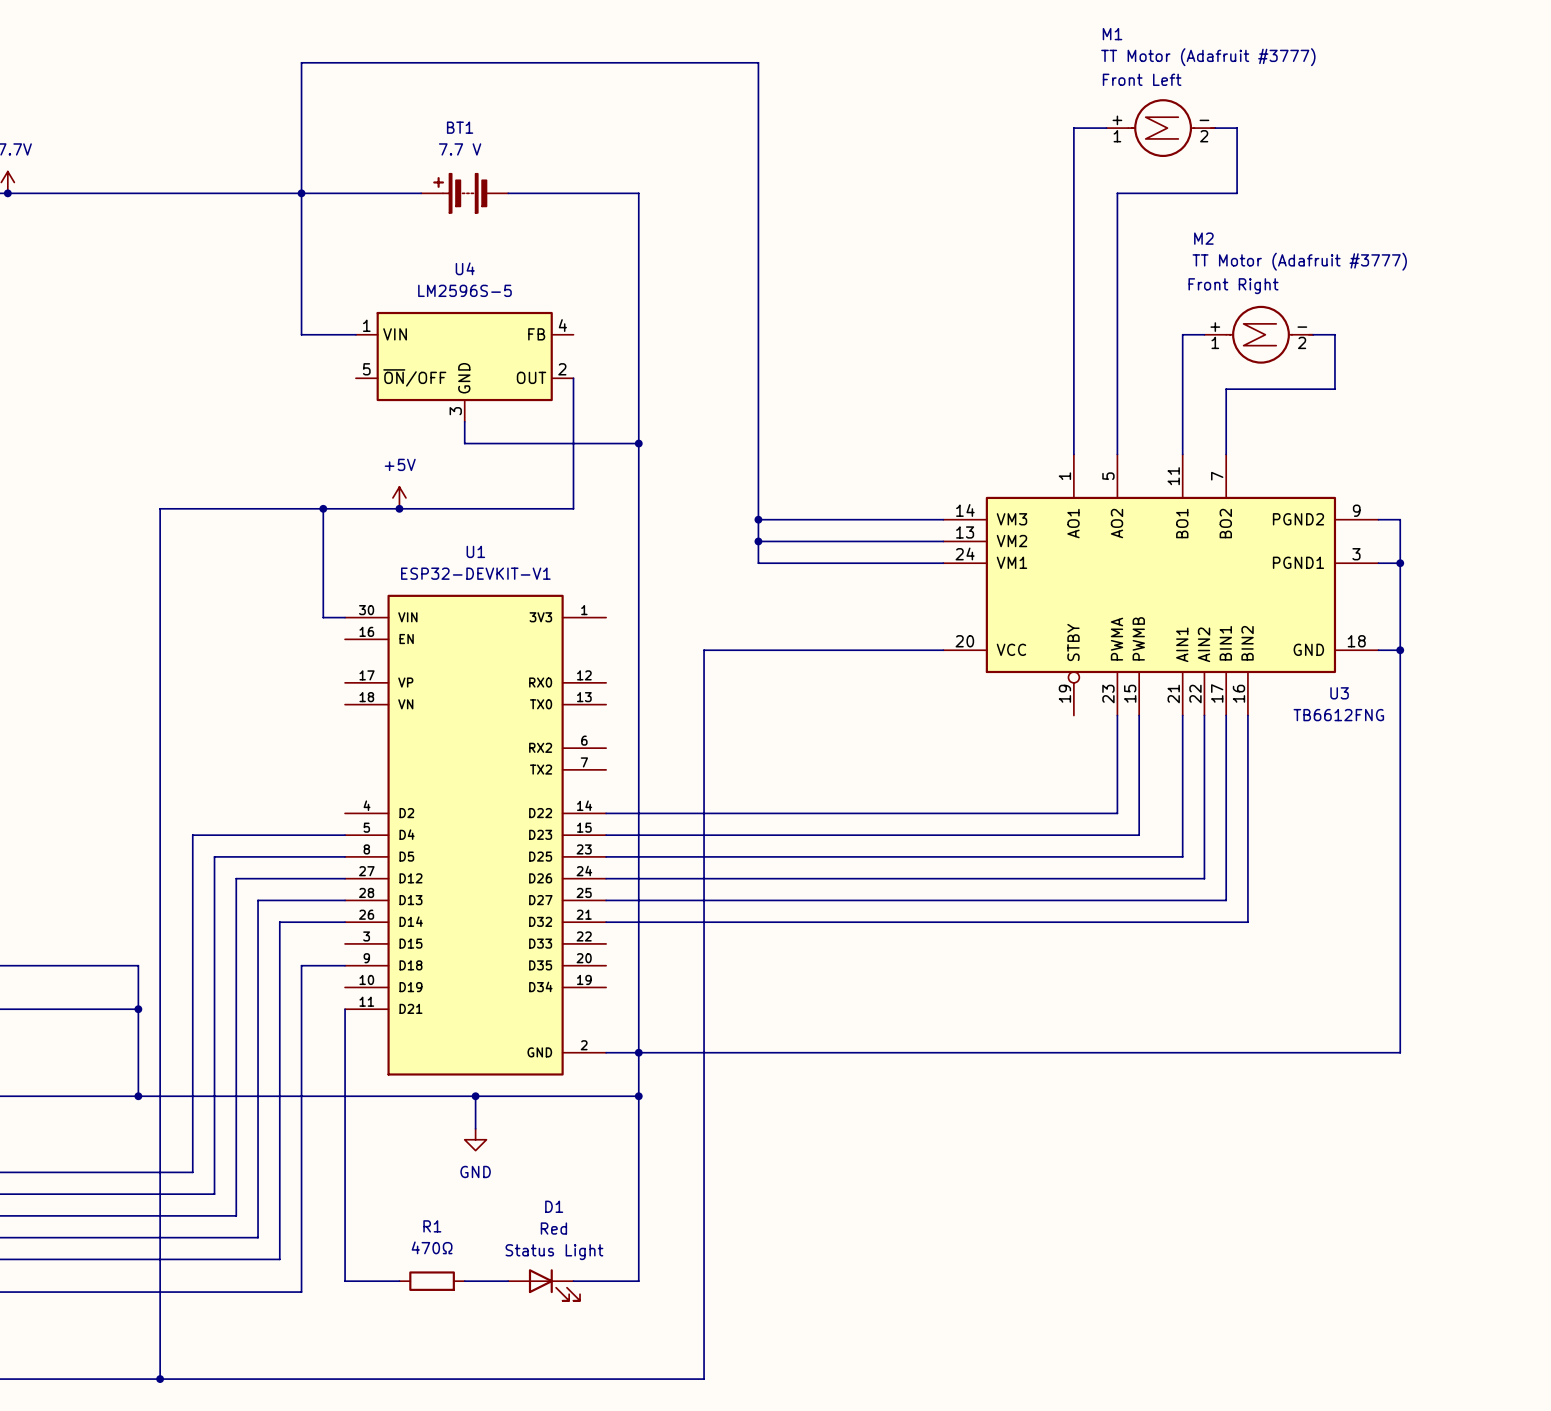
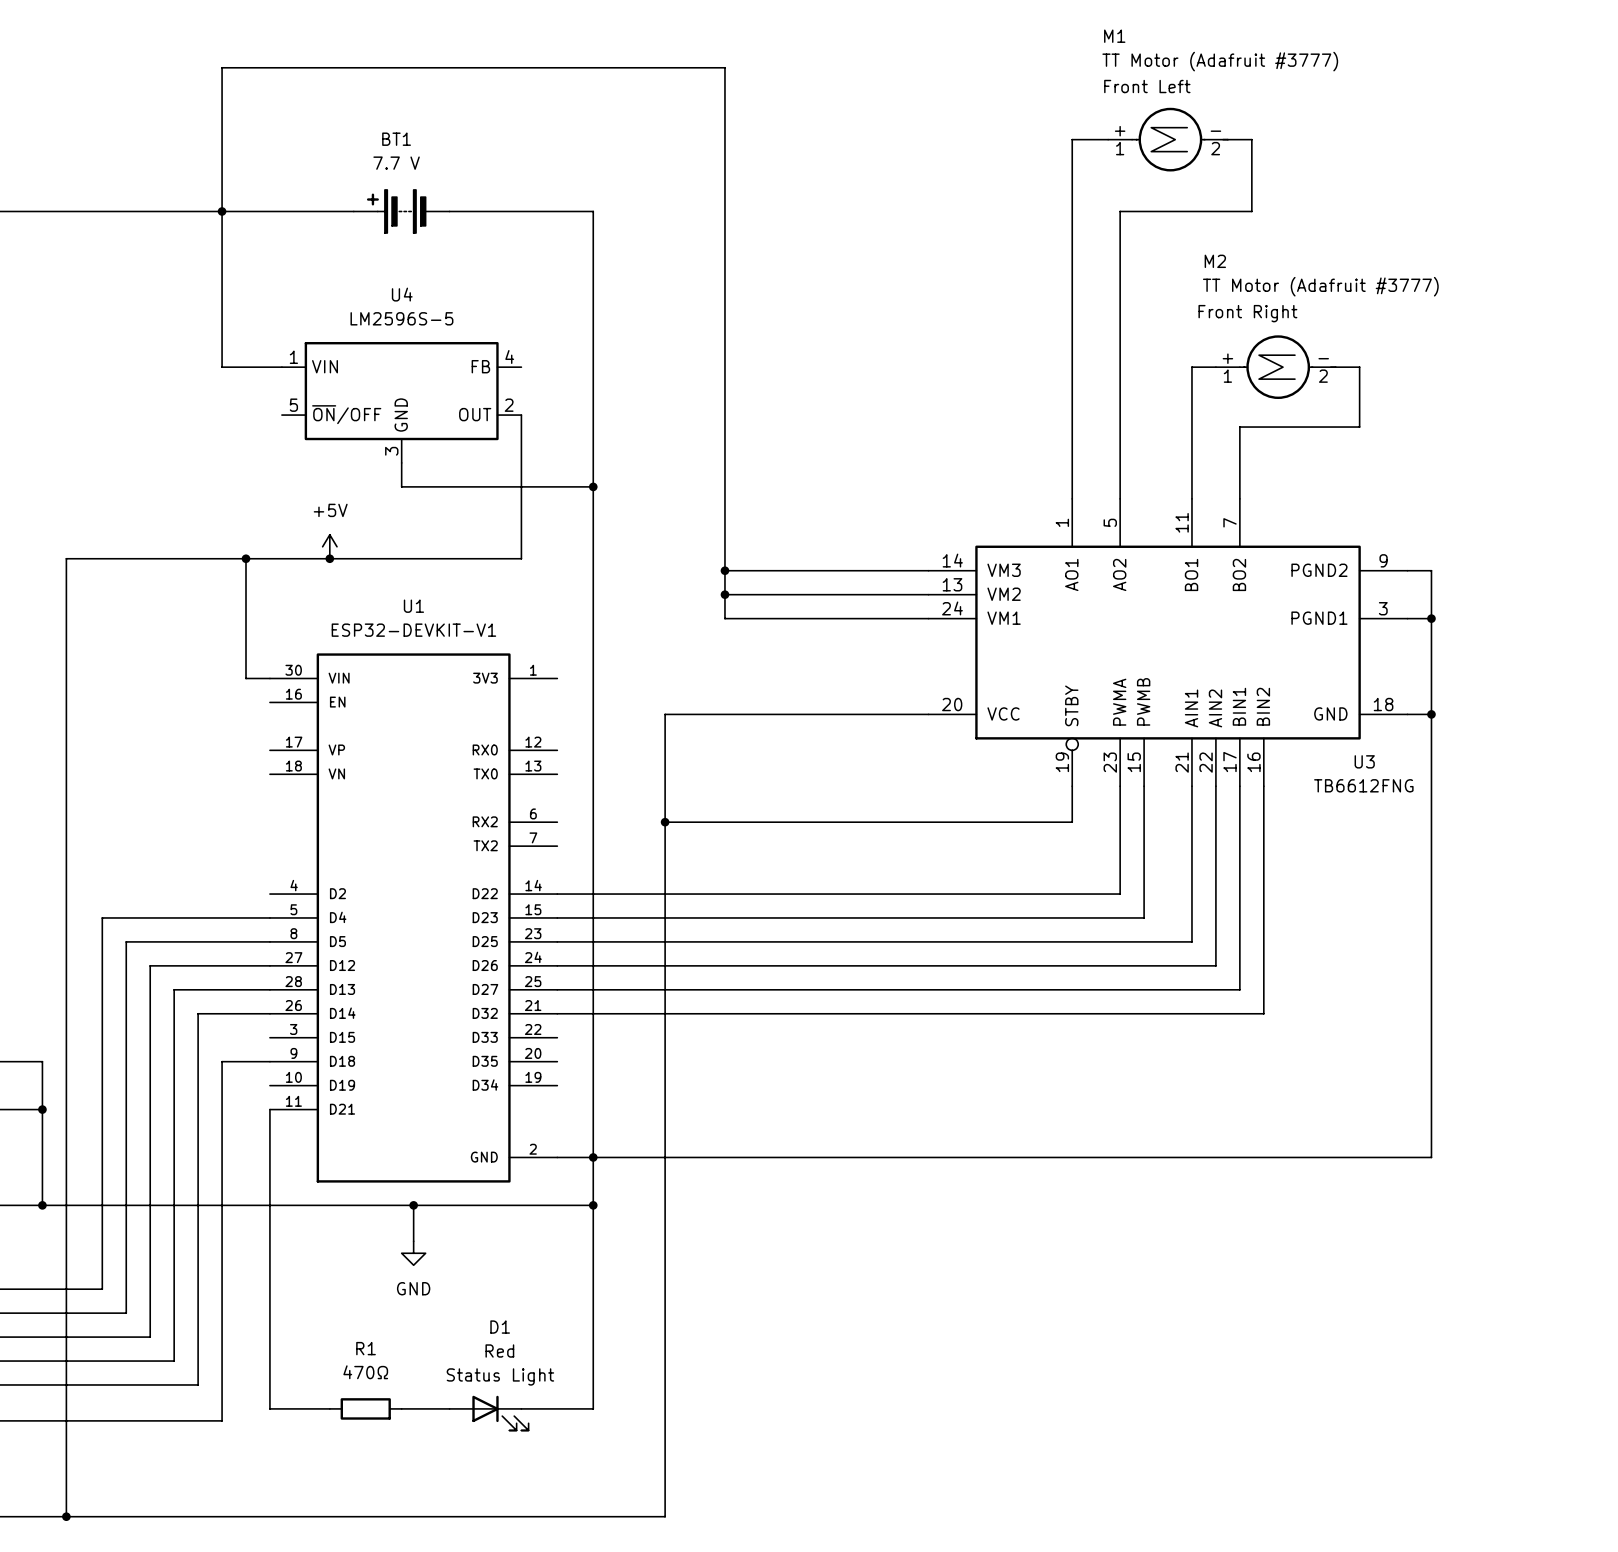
wire: none -> (1072, 786) (1072, 822) (665, 822)
junction: none -> (665, 822)

